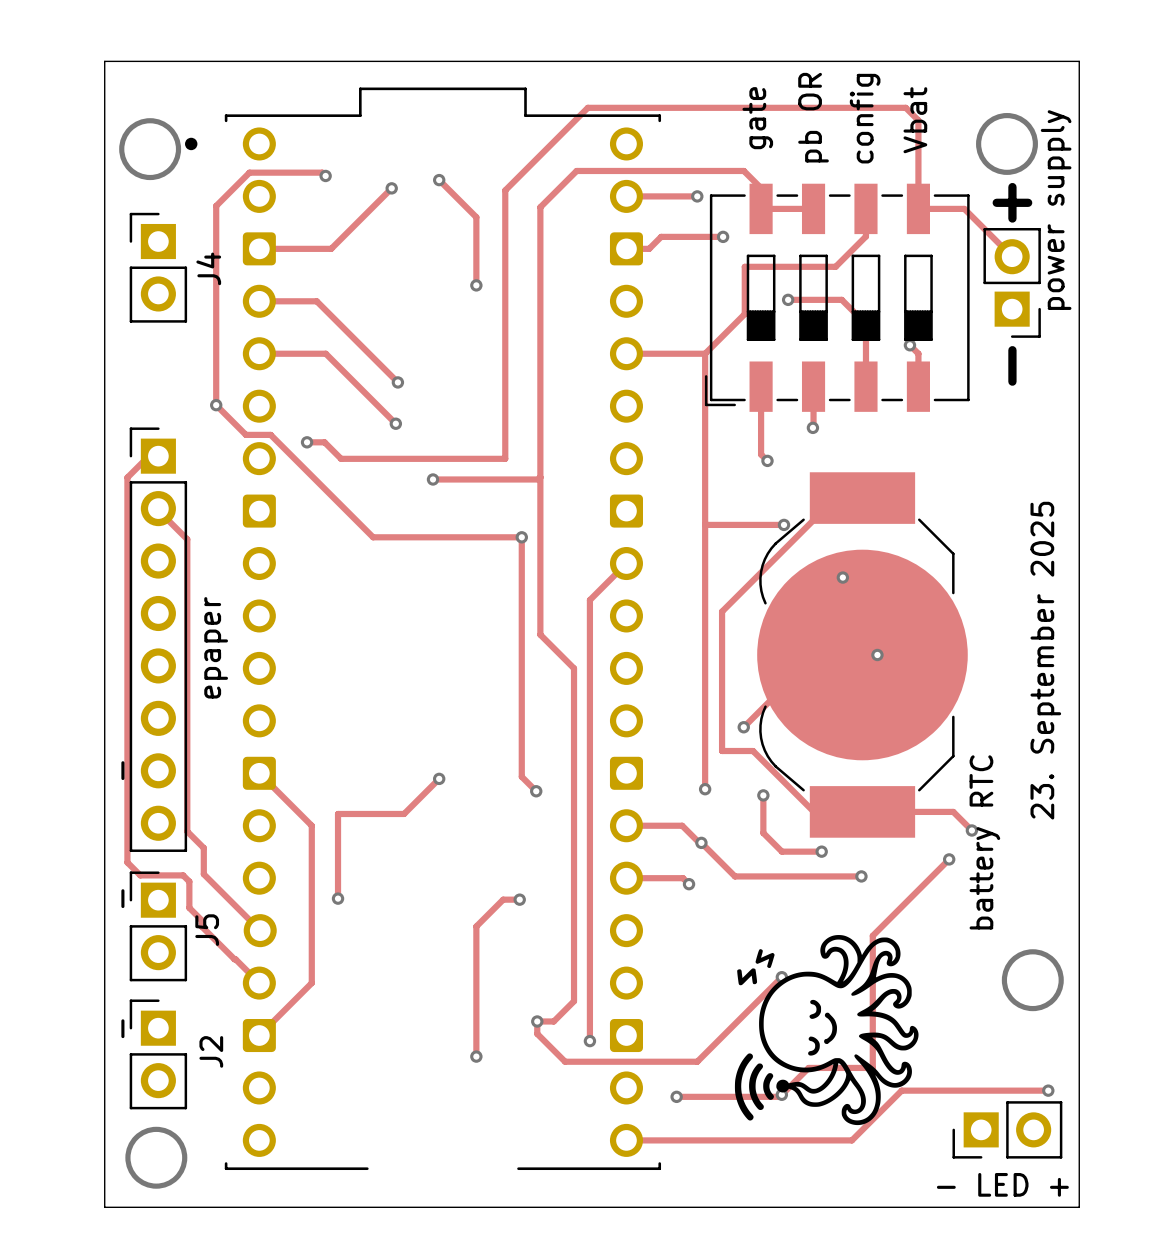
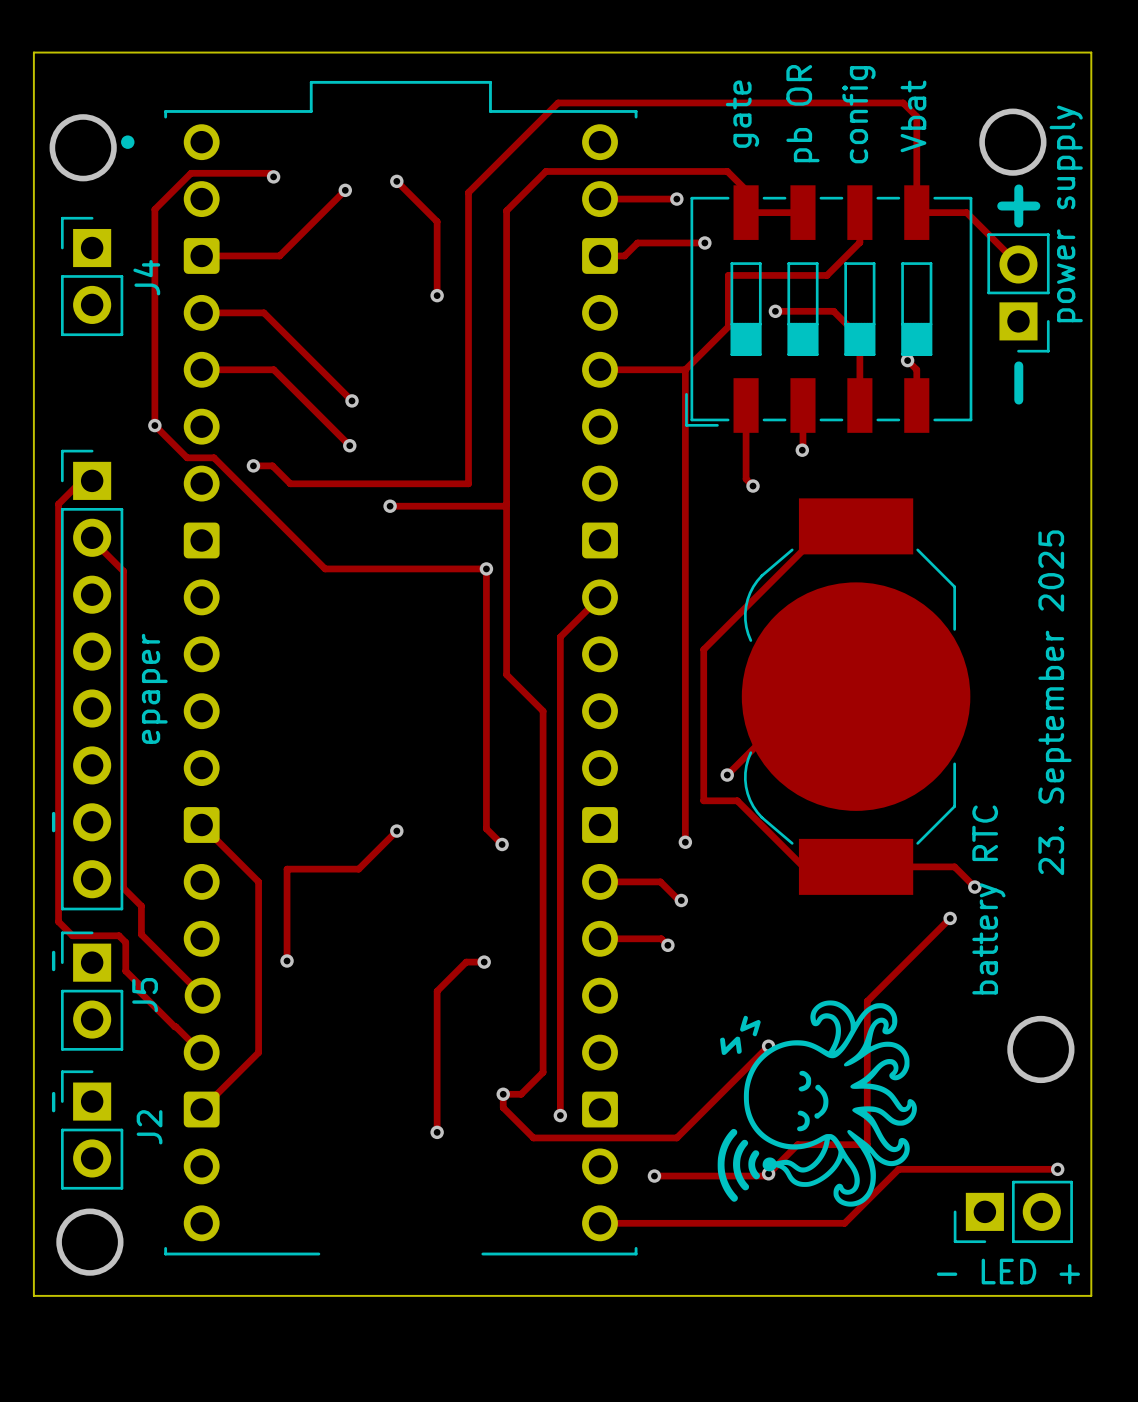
track: (705, 524) (784, 524) -> none
via: (784, 524) -> none
via: (842, 577) -> none
via: (877, 654) -> none
track: (763, 795) (763, 833) (781, 851) (821, 851) -> none
via: (763, 795) -> none
track: (701, 842) (734, 876) (861, 876) -> none
via: (821, 851) -> none
via: (861, 876) -> none

